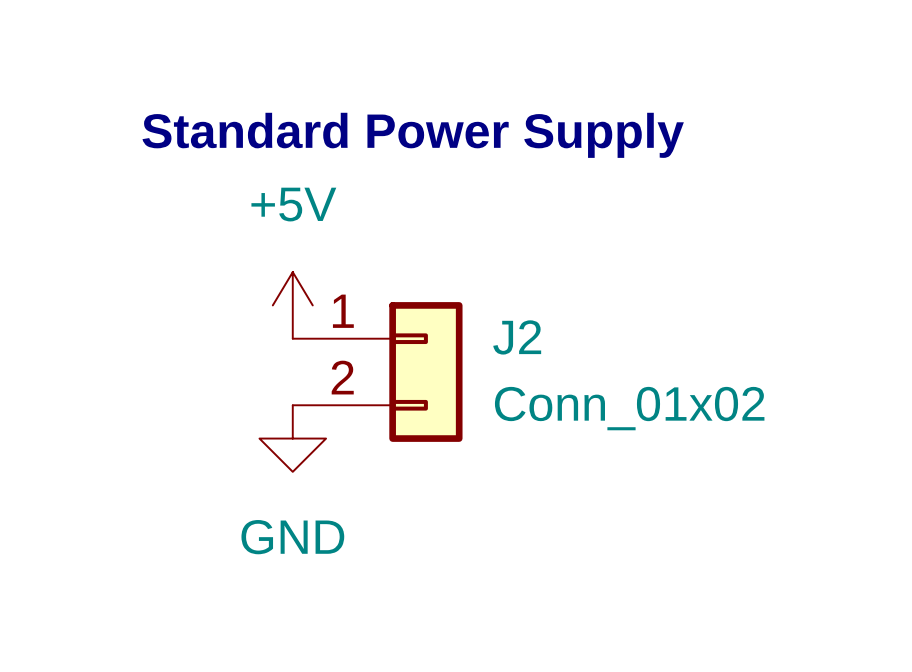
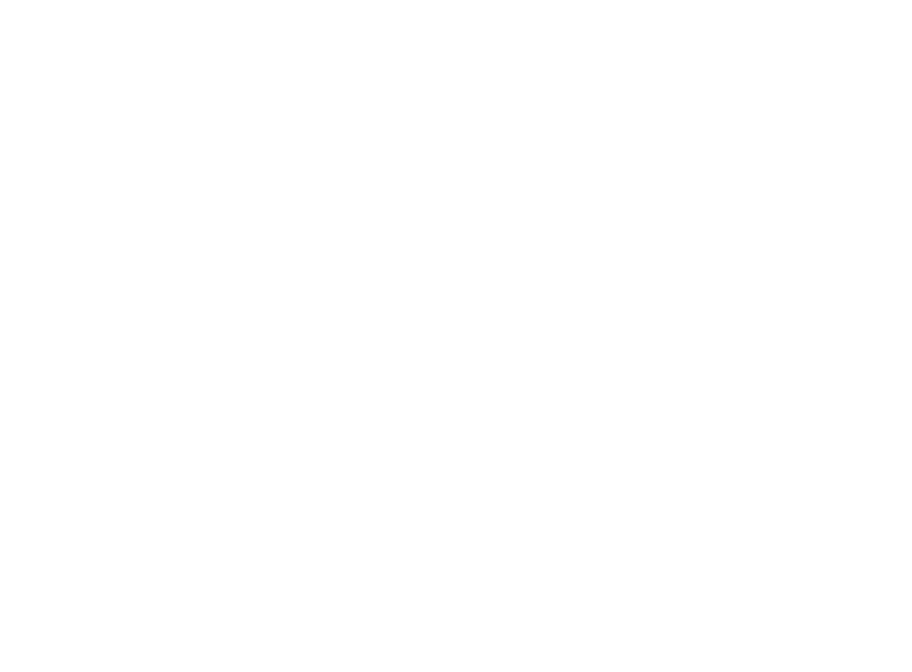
text: Standard Power Supply (413, 135) -> none
power symbol: +5V (292, 305) -> none
J2: Conn_01x02 (377, 371) -> none
power symbol: GND (292, 438) -> none

